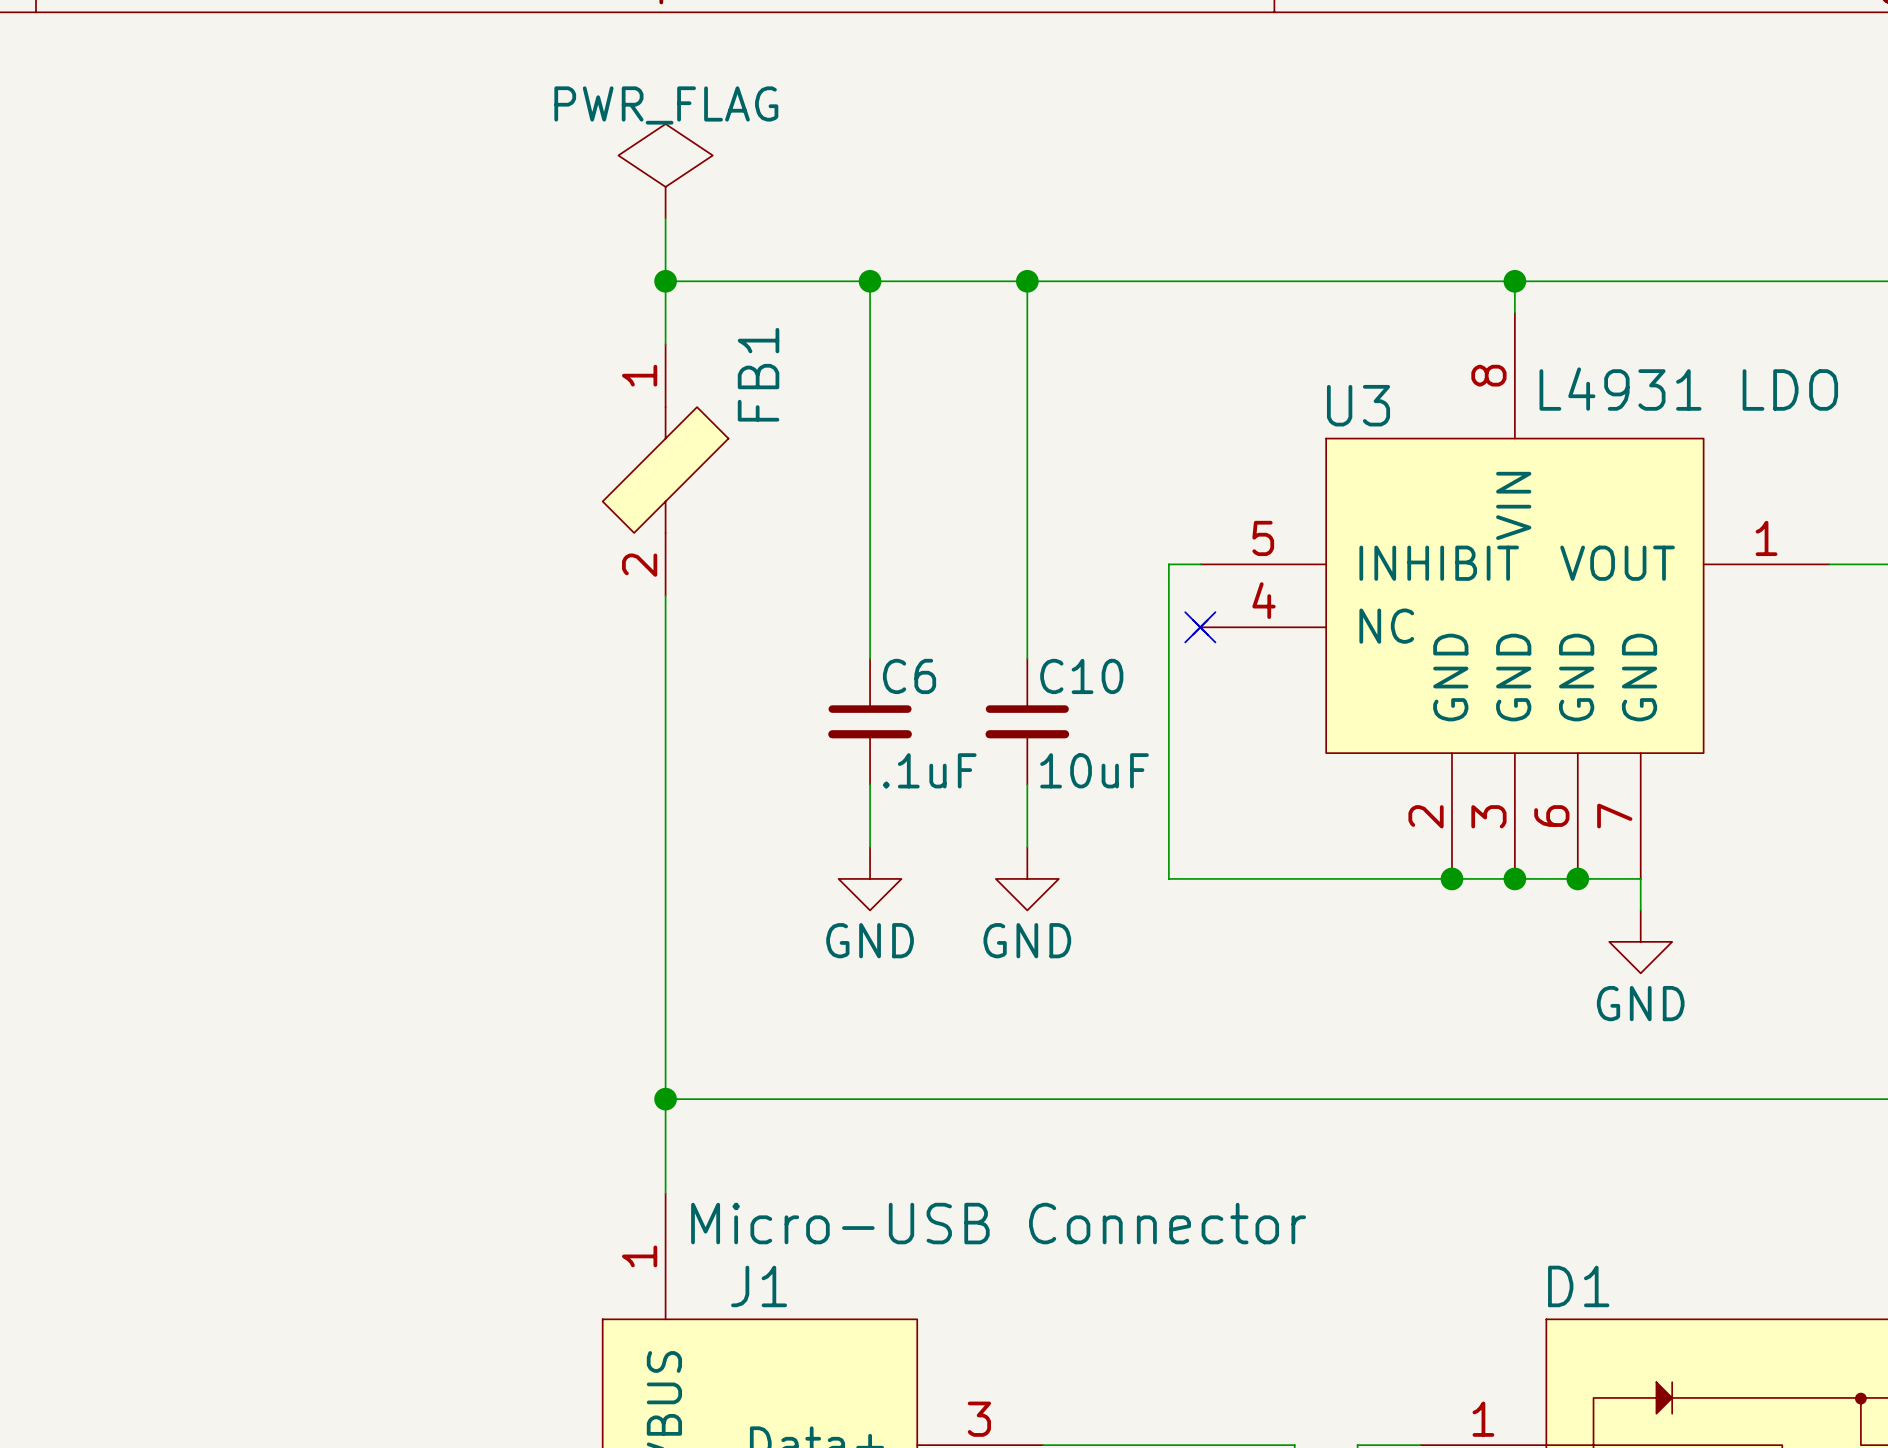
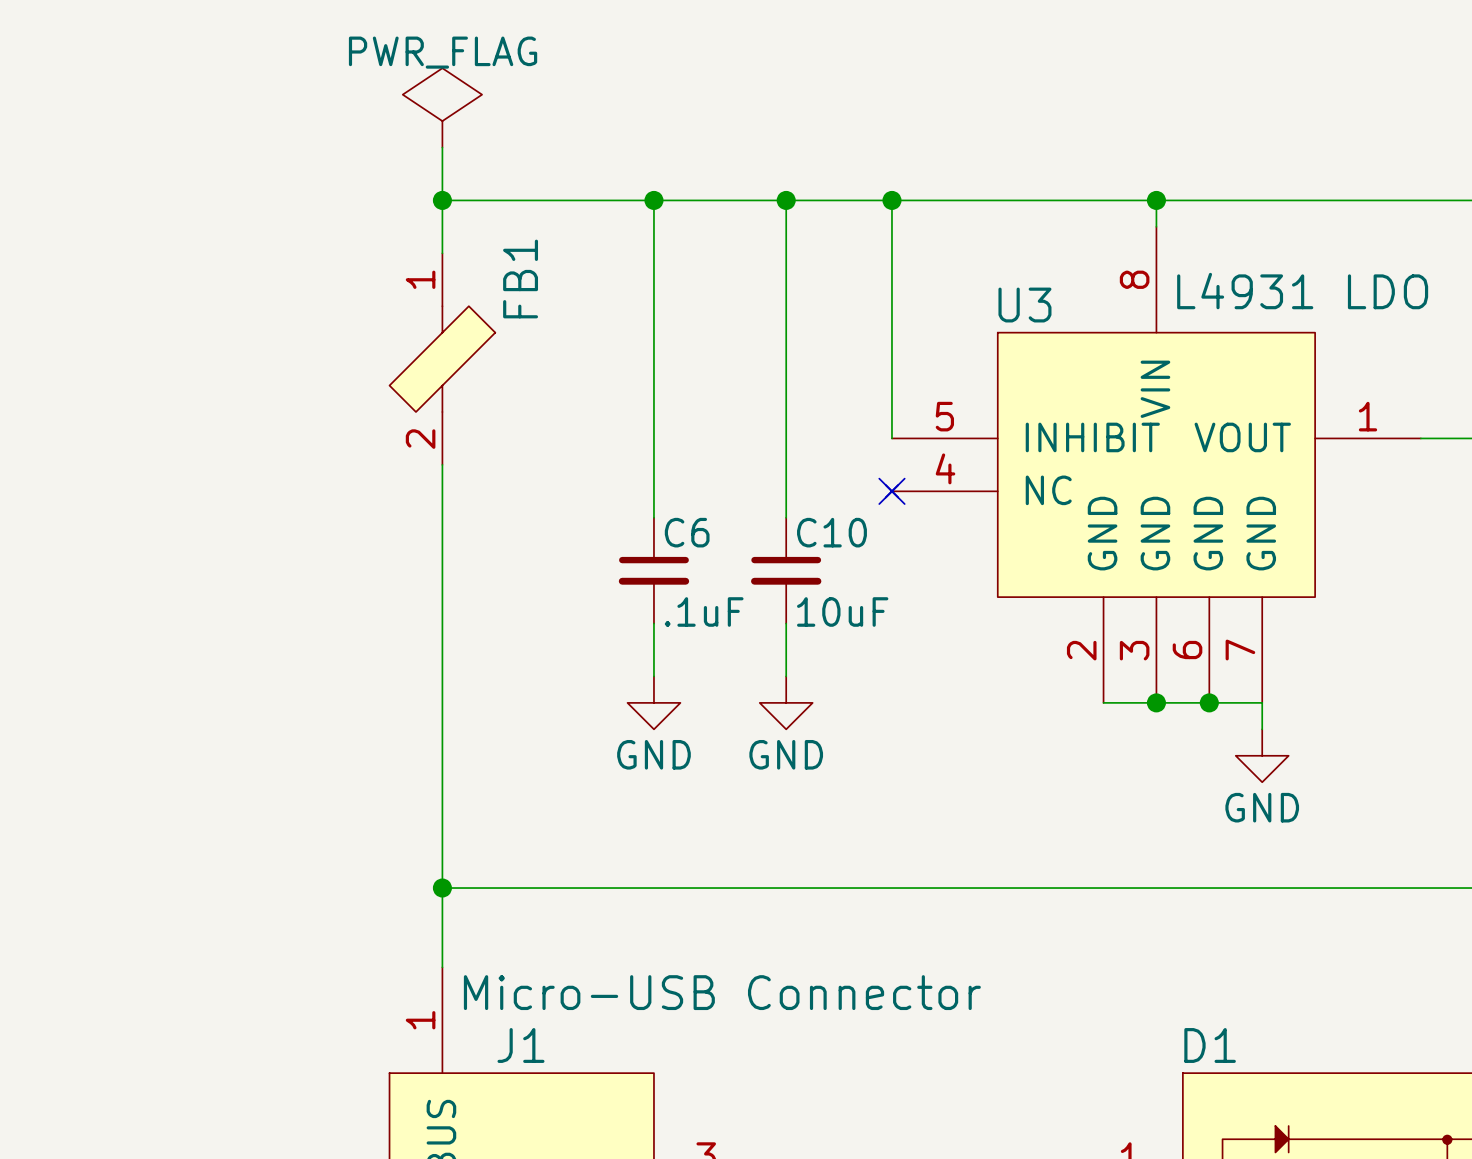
wire: (870, 281) (870, 658) -> (653, 200) (653, 517)
junction position: (870, 281) -> (653, 200)
wire: (1027, 281) (1027, 658) -> (786, 200) (786, 517)
junction position: (1027, 281) -> (786, 200)
junction: none -> (891, 200)
wire: (1200, 564) (1168, 564) (1168, 878) (1451, 878) -> (891, 438) (891, 200)
C6 position: (870, 721) -> (653, 570)
C10 position: (1027, 721) -> (786, 570)
wire: (870, 784) (870, 847) -> (653, 623) (653, 676)
wire: (1027, 784) (1027, 847) -> (786, 623) (786, 676)
power symbol position: GND (870, 878) -> GND (653, 702)
power symbol position: GND (1027, 878) -> GND (786, 702)
junction: (1451, 878) -> none

